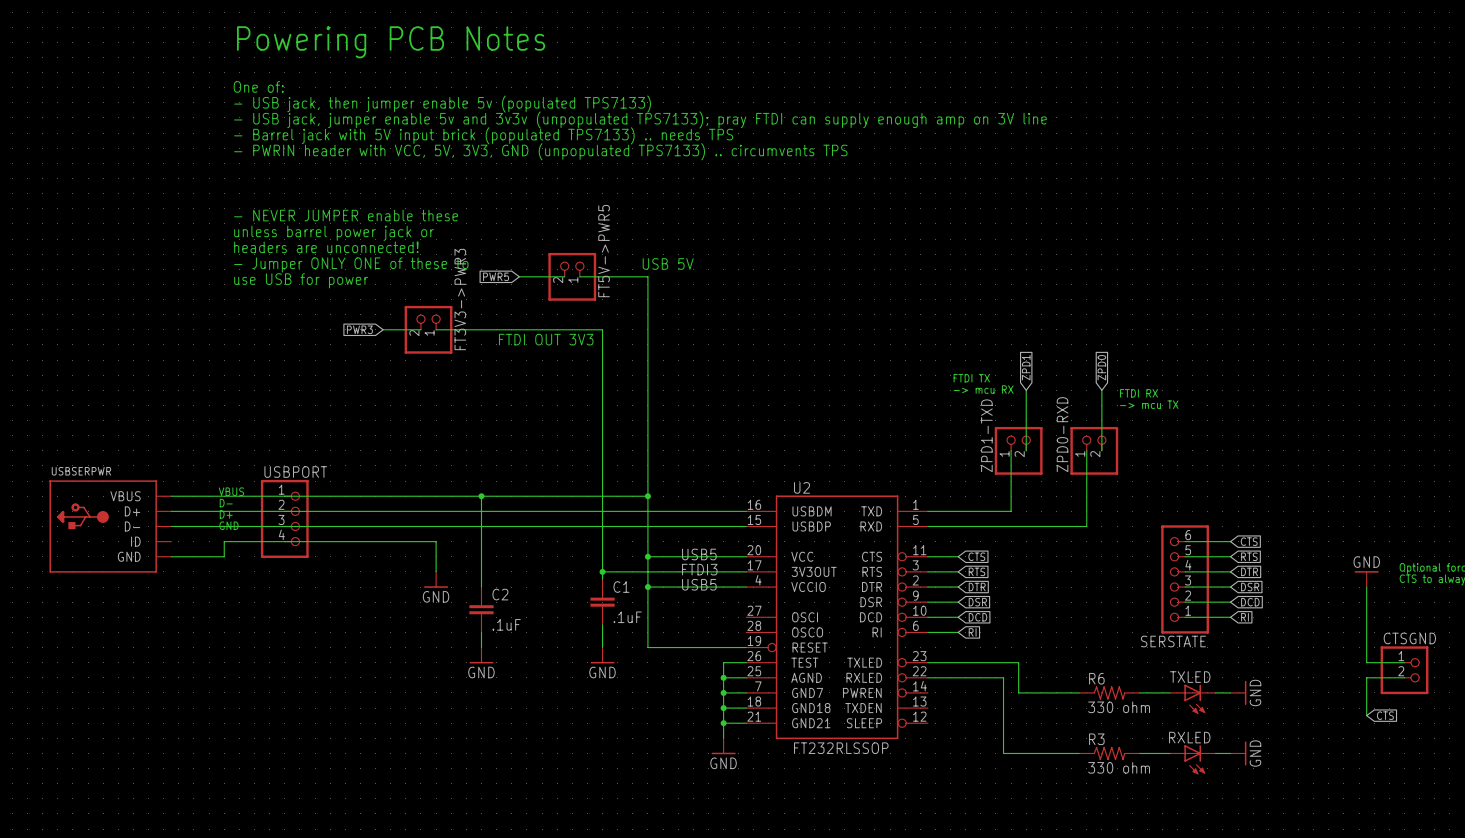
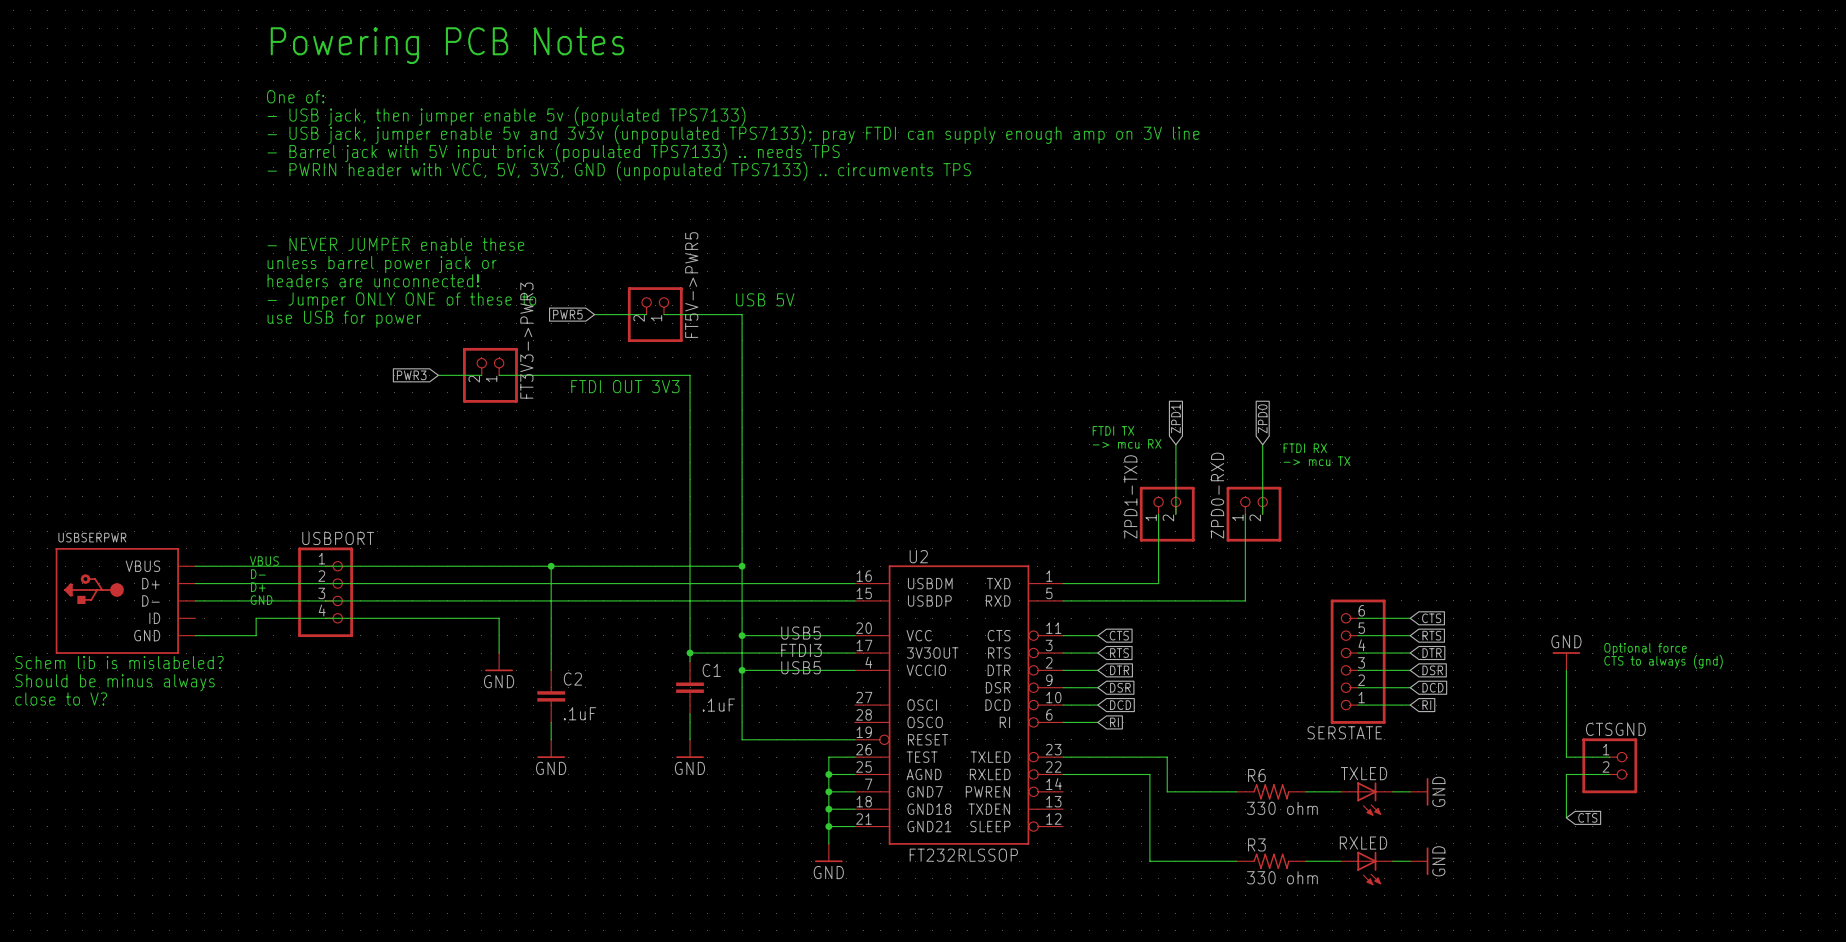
text: none -> Schem lib is mislabeled? (119, 662)
text: none -> Should be minus always (115, 682)
text: none -> close to V? (61, 699)

